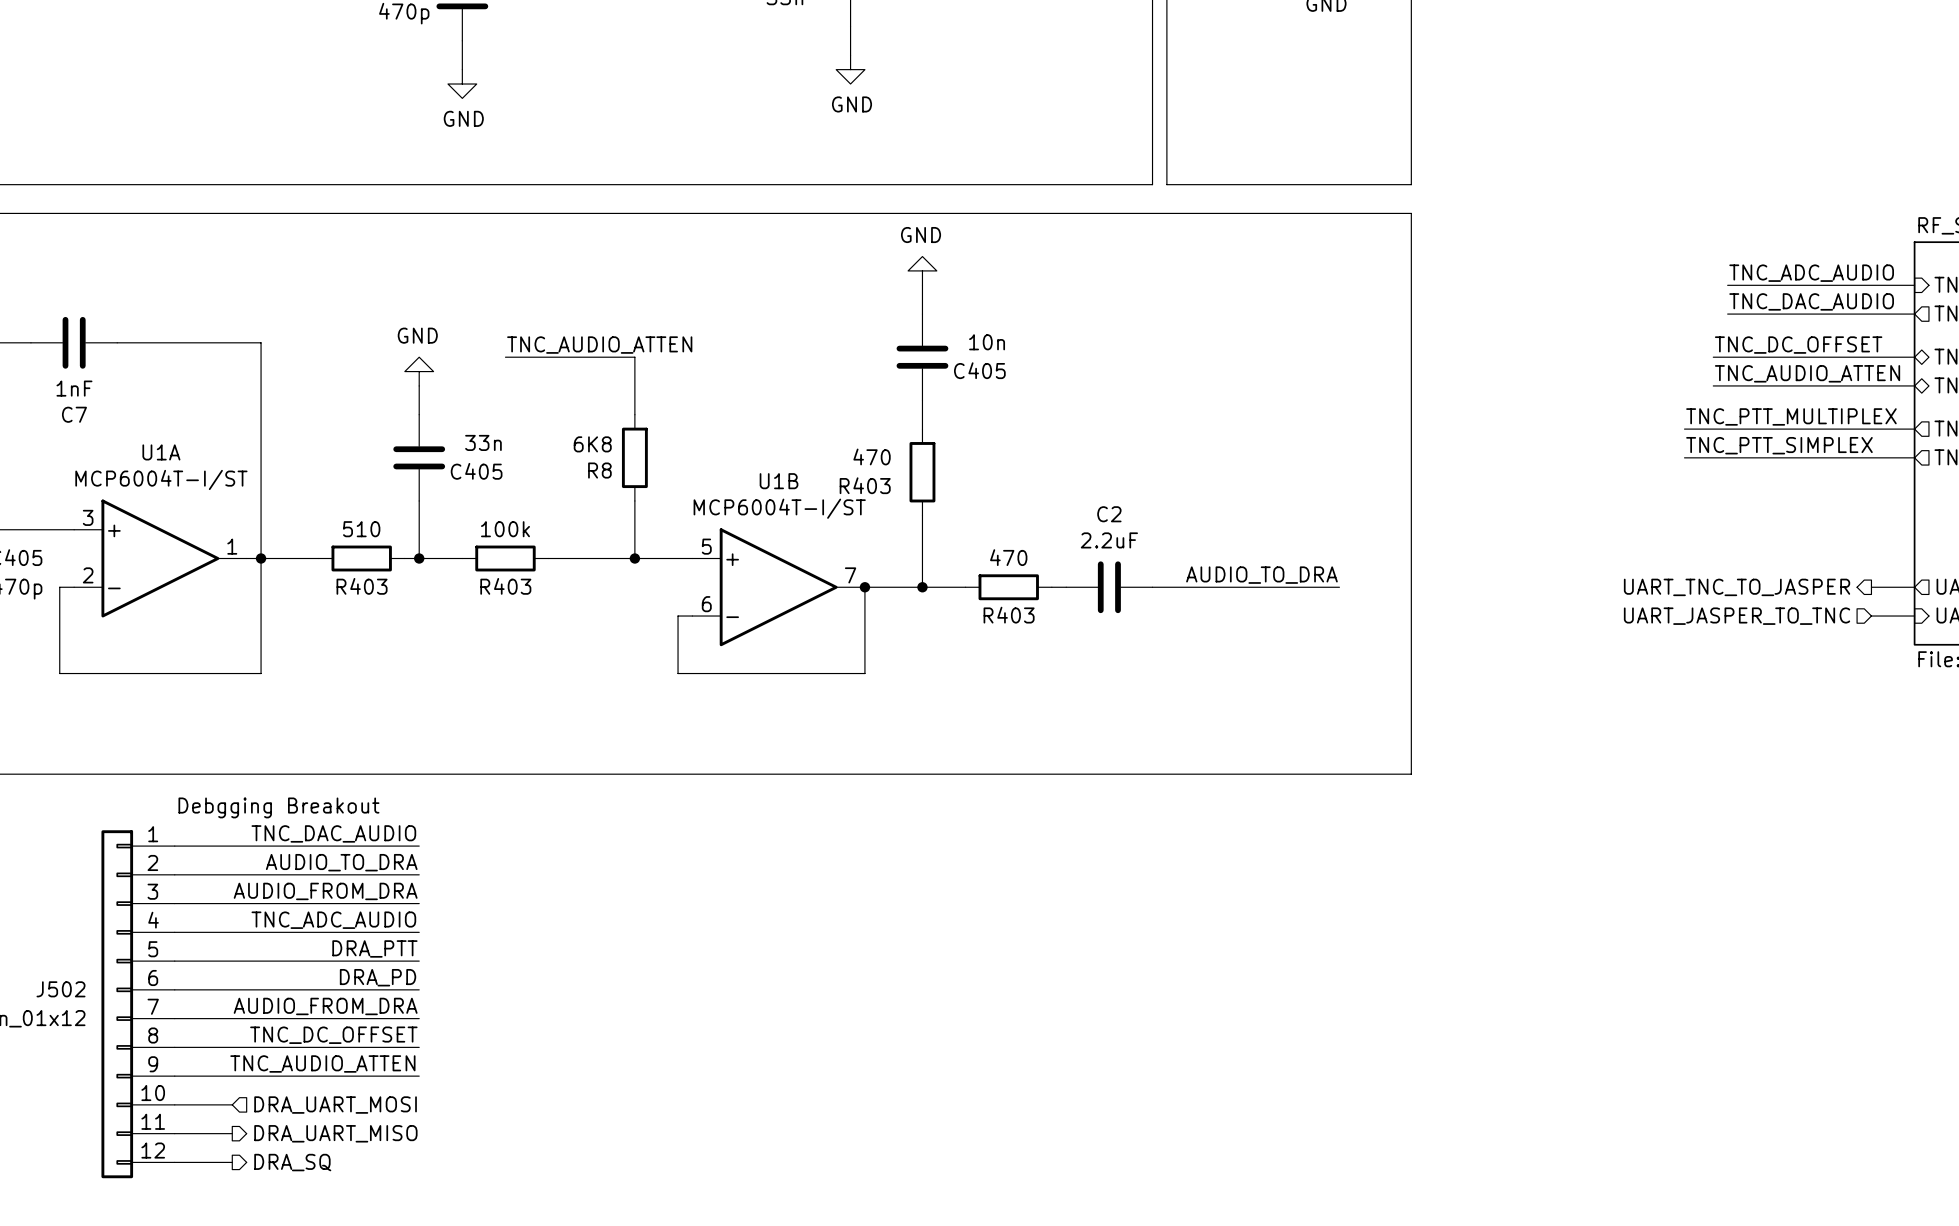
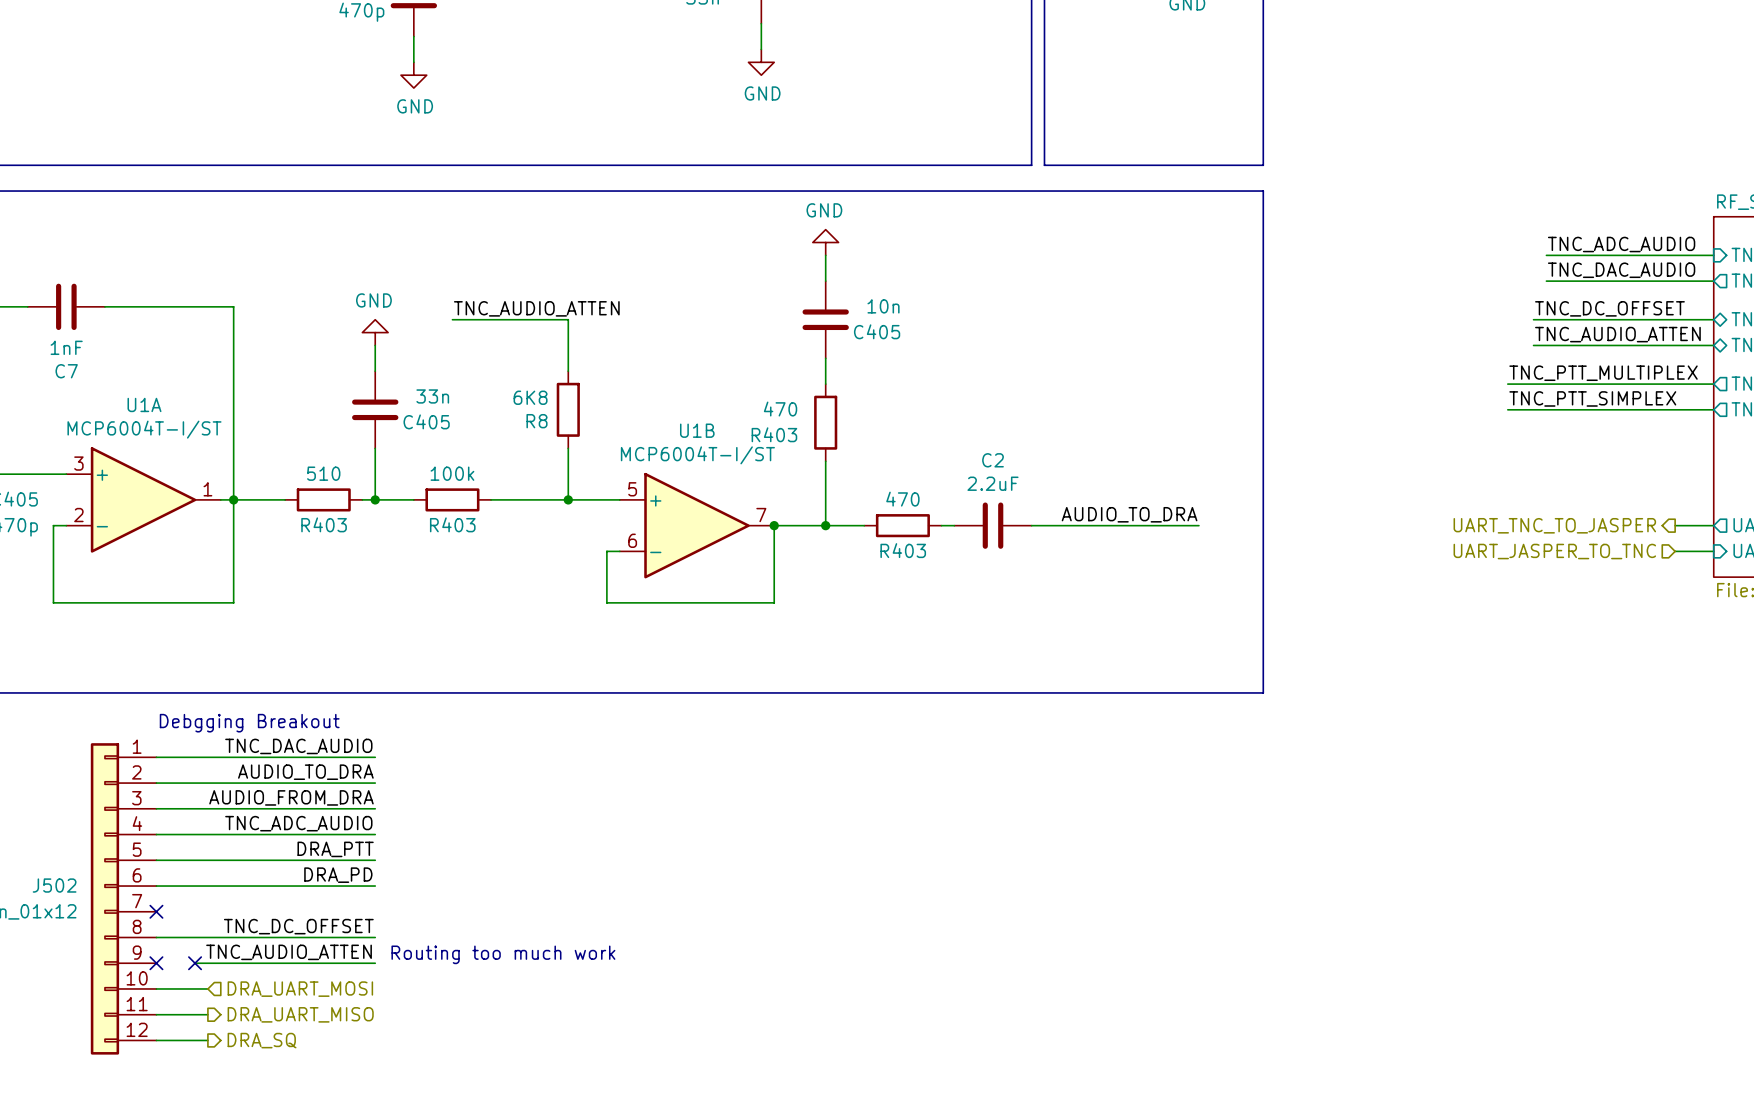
label: AUDIO_FROM_DRA (325, 1006) -> none
wire: (174, 1018) (419, 1018) -> none
no-connect mark: none -> (156, 911)
text: none -> Routing too much work (503, 954)
wire: (174, 1076) (217, 1076) -> none
no-connect mark: none -> (156, 963)
no-connect mark: none -> (195, 963)

